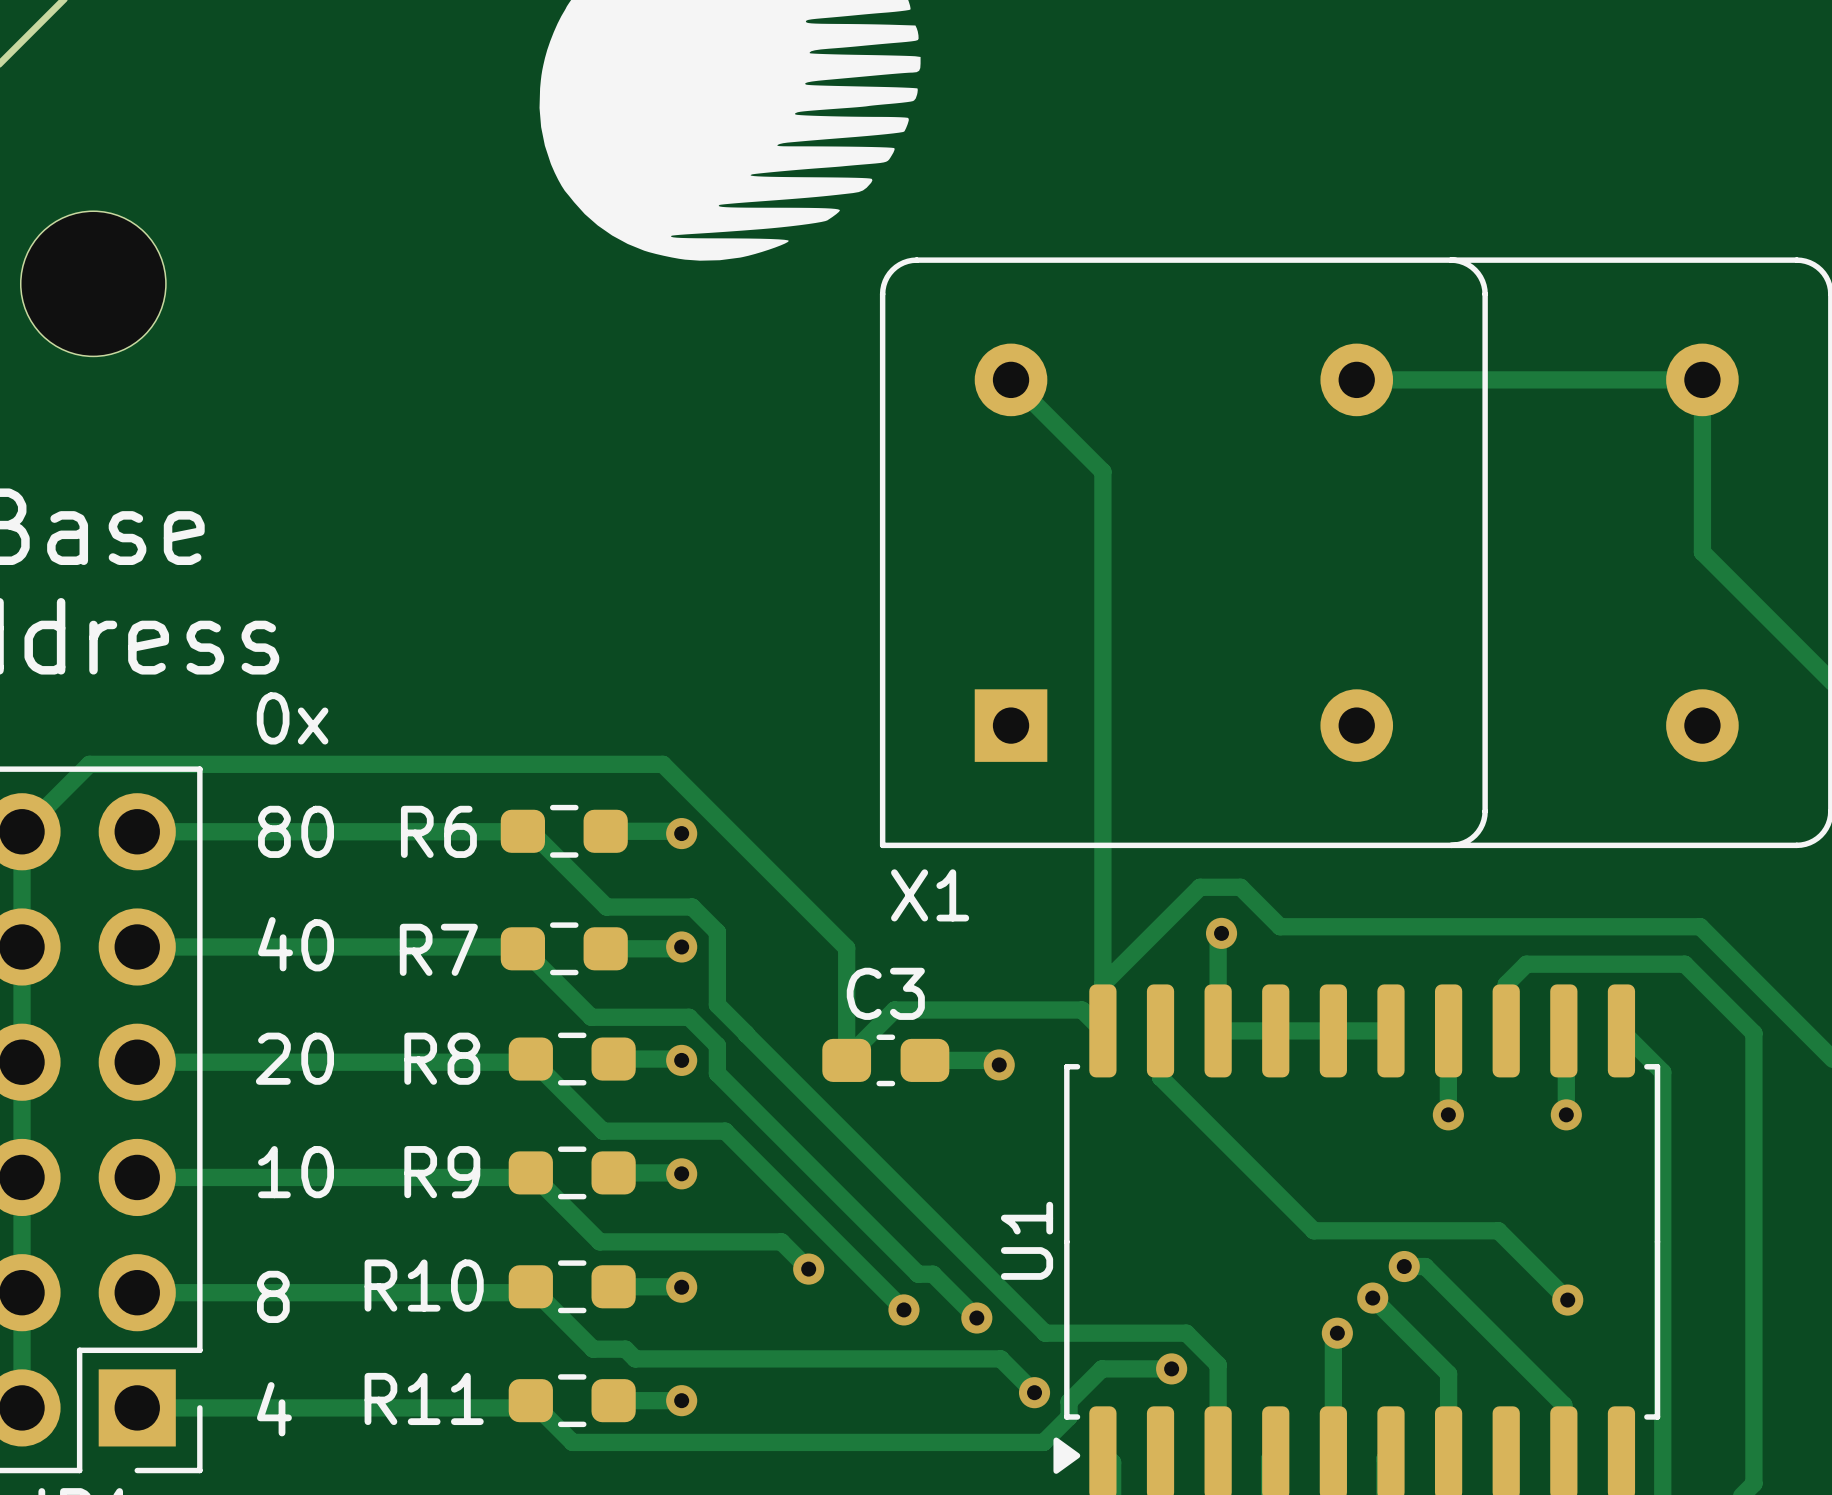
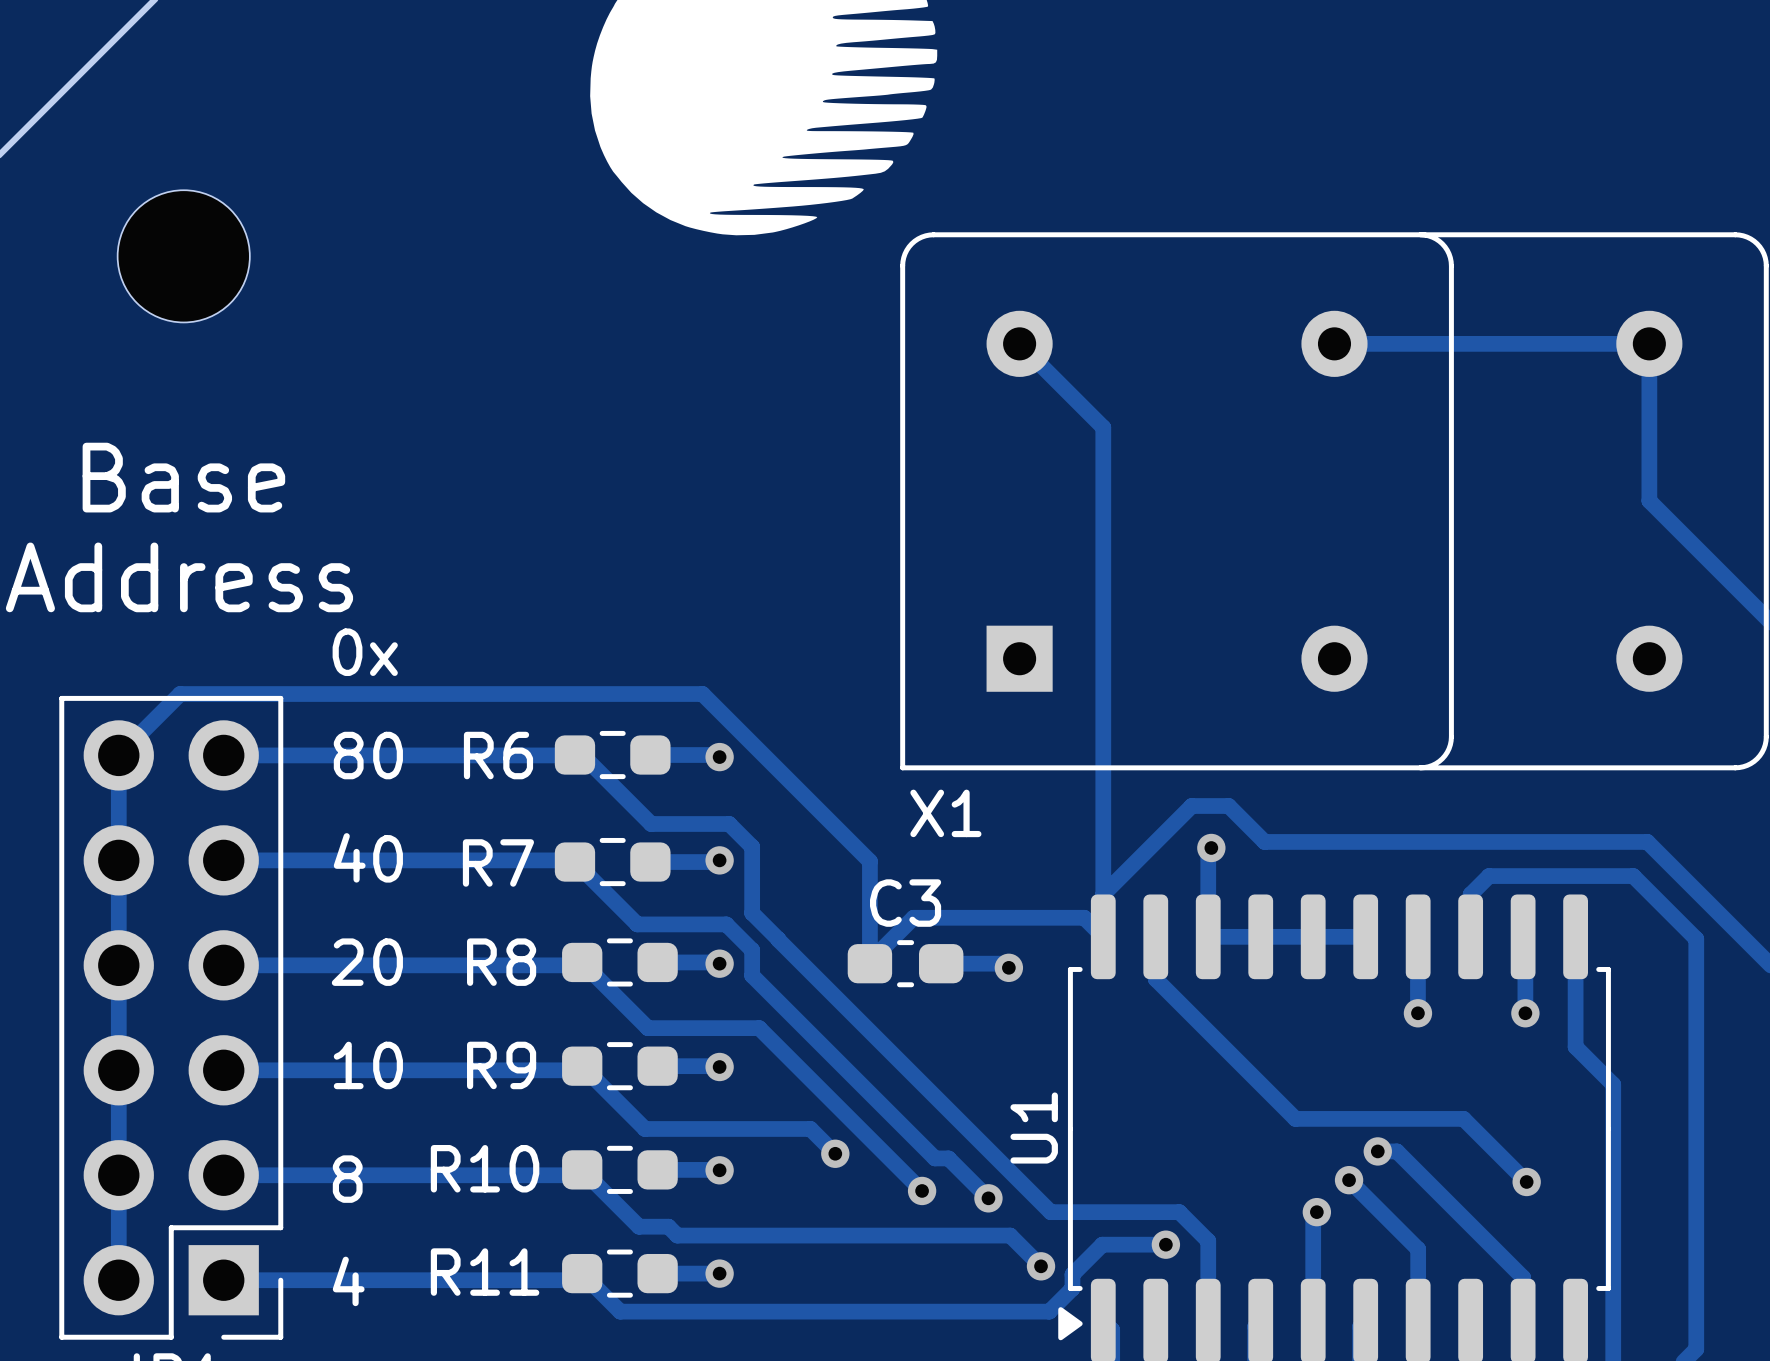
track: (1621, 1030) (1662, 1072) (1662, 1193) -> (1575, 936) (1575, 1046) (1613, 1084)

